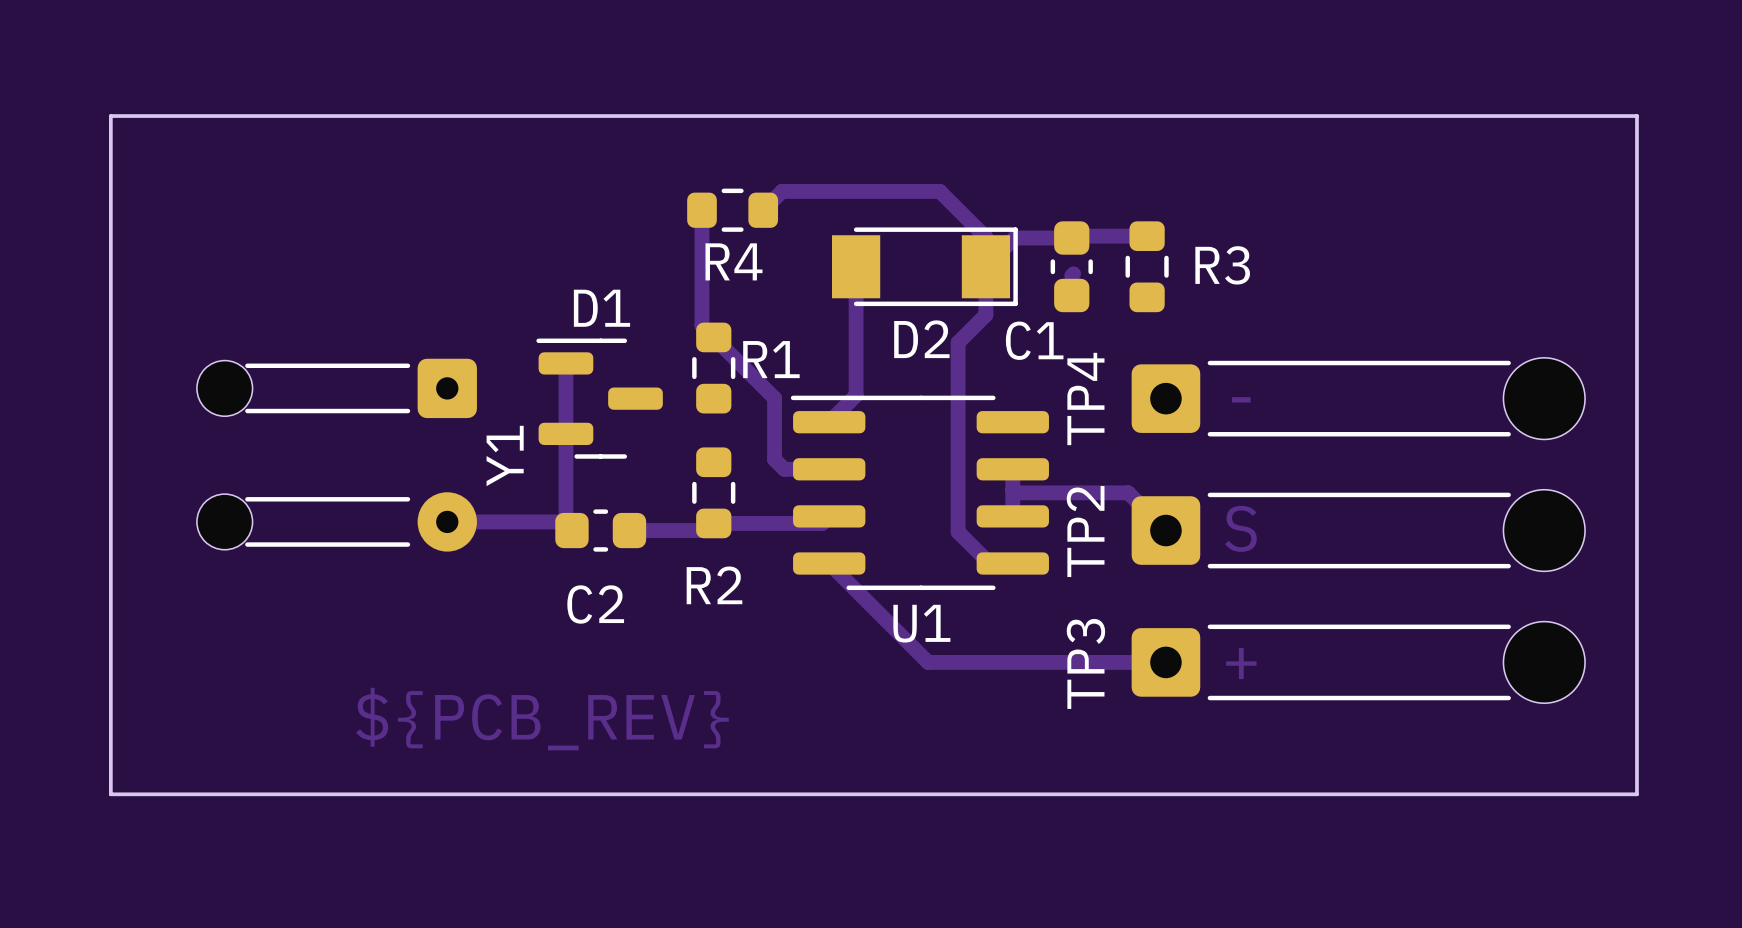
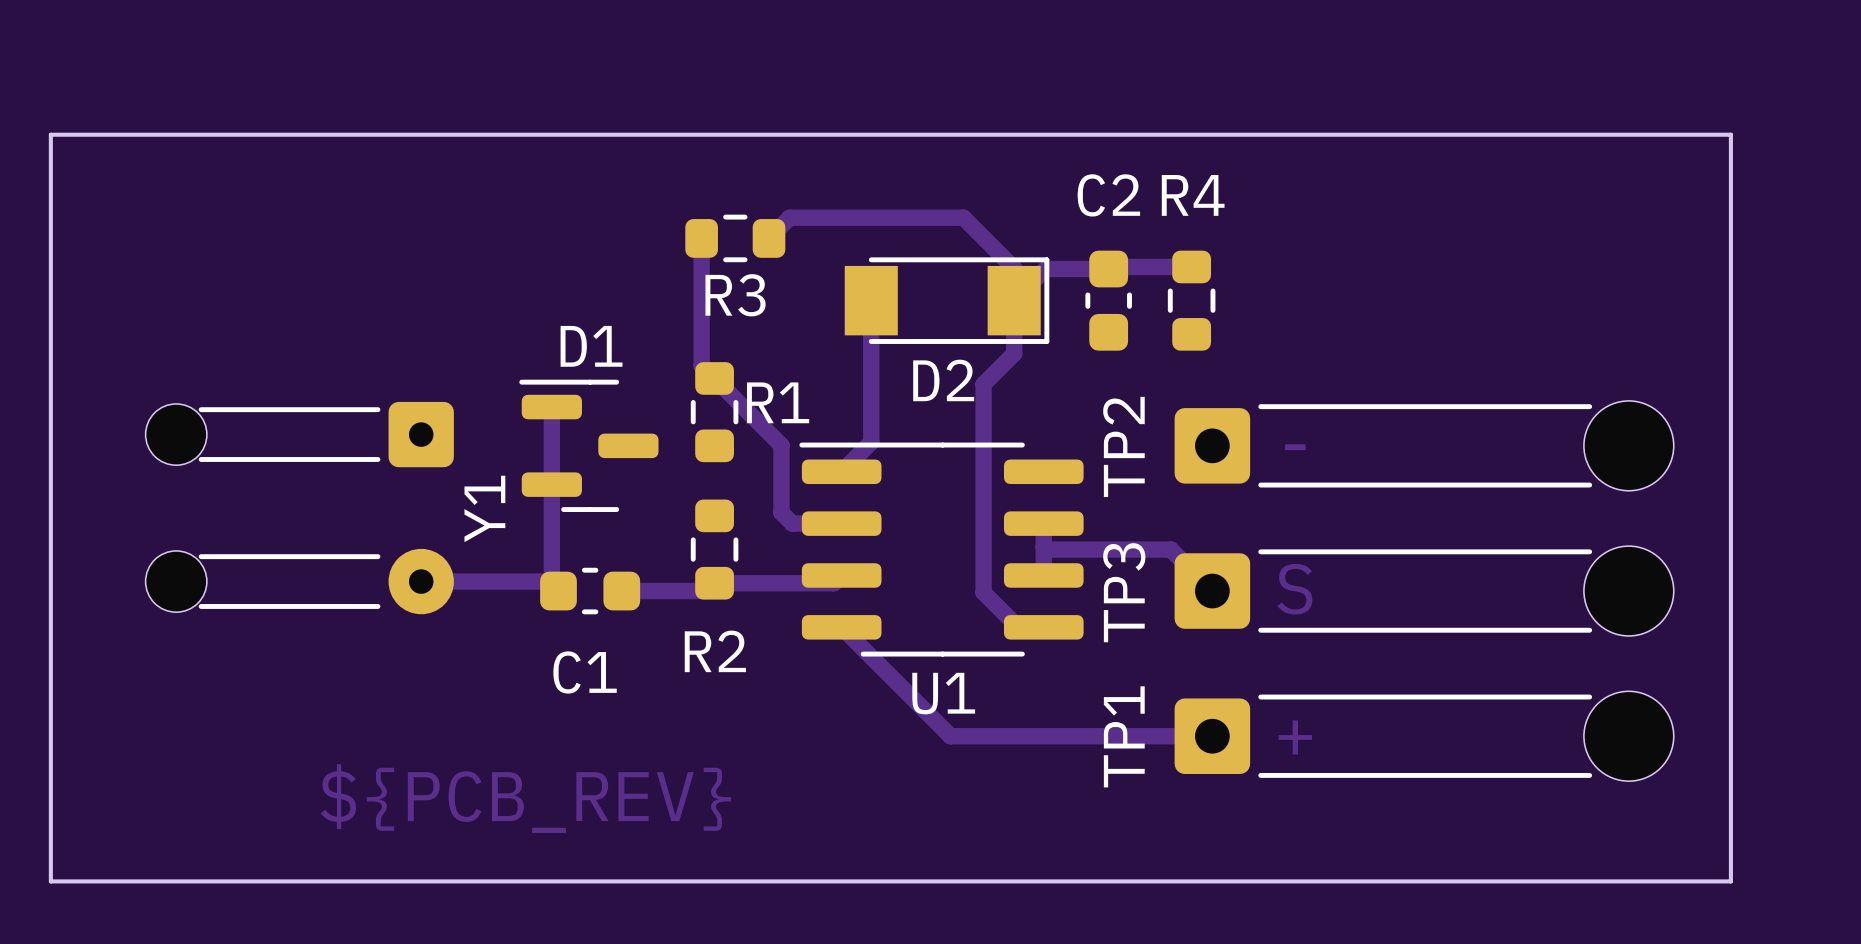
R4 name: R4 (733, 261) -> R3 (735, 295)
R3 name: R3 (1222, 265) -> R4 (1193, 195)
track: (1073, 273) (1071, 275) -> none
C1 name: C1 (1034, 340) -> C2 (1108, 195)
TP4 name: TP4 (1085, 398) -> TP2 (1123, 446)
TP2 name: TP2 (1085, 531) -> TP3 (1124, 592)
C2 name: C2 (595, 604) -> C1 (585, 672)
TP3 name: TP3 (1085, 663) -> TP1 (1124, 736)

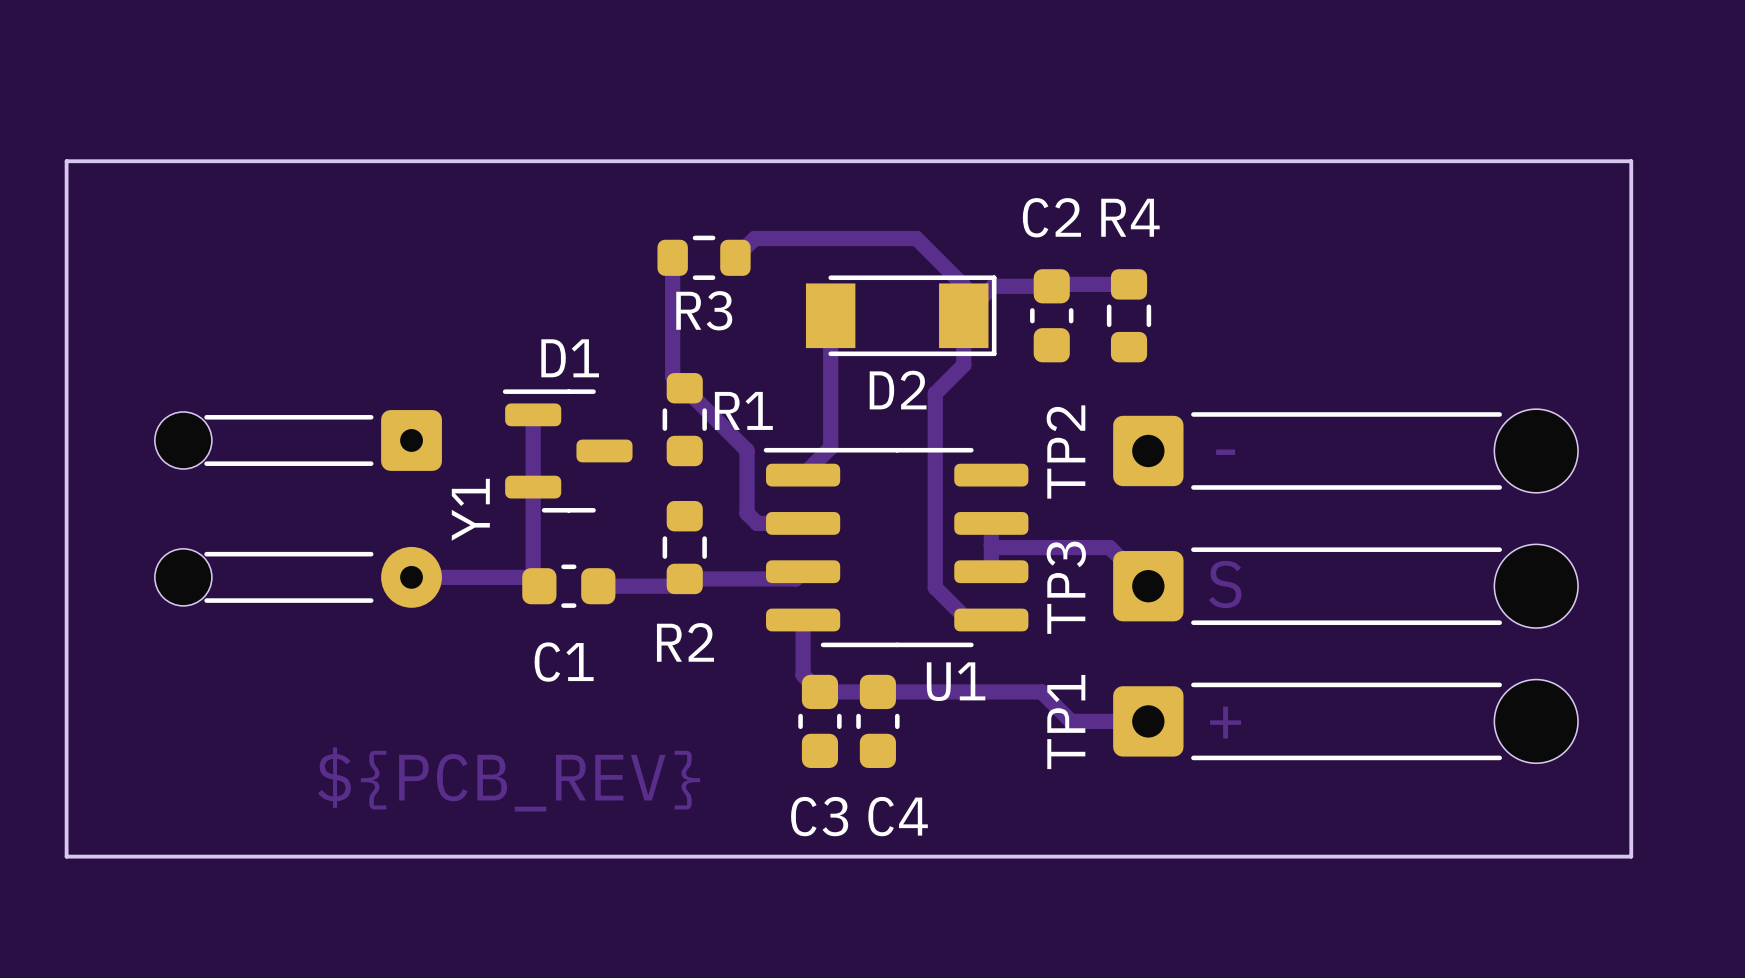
track: (841, 627) (950, 736) (1129, 736) -> (803, 620) (803, 675) (819, 691) (1041, 691) (1071, 721)
U1 name position: U1 (943, 693) -> U1 (956, 681)
C3: none -> (819, 721)
C4: none -> (877, 721)

